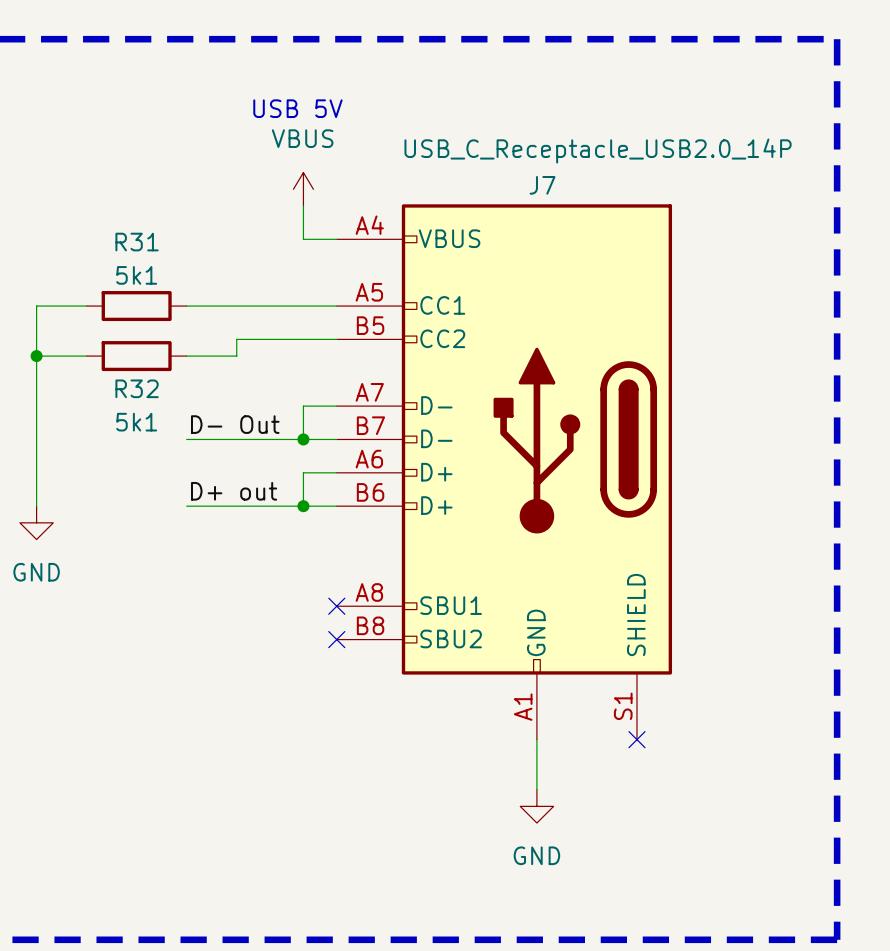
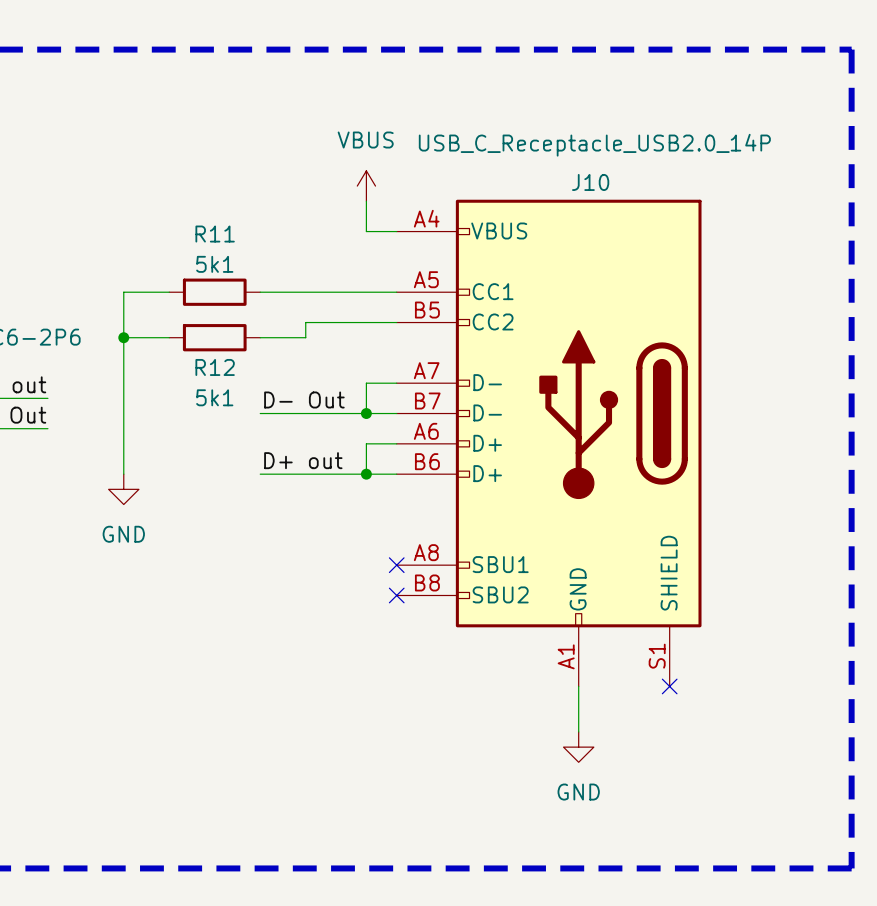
text: USB 5V (297, 108) -> none
J7 value position: USB_C_Receptacle_USB2.0_14P (598, 151) -> USB_C_Receptacle_USB2.0_14P (594, 145)
J7 name: J7 (542, 185) -> J10 (590, 182)
R31 name: R31 (137, 242) -> R11 (215, 234)
R32 name: R32 (137, 388) -> R12 (215, 367)

